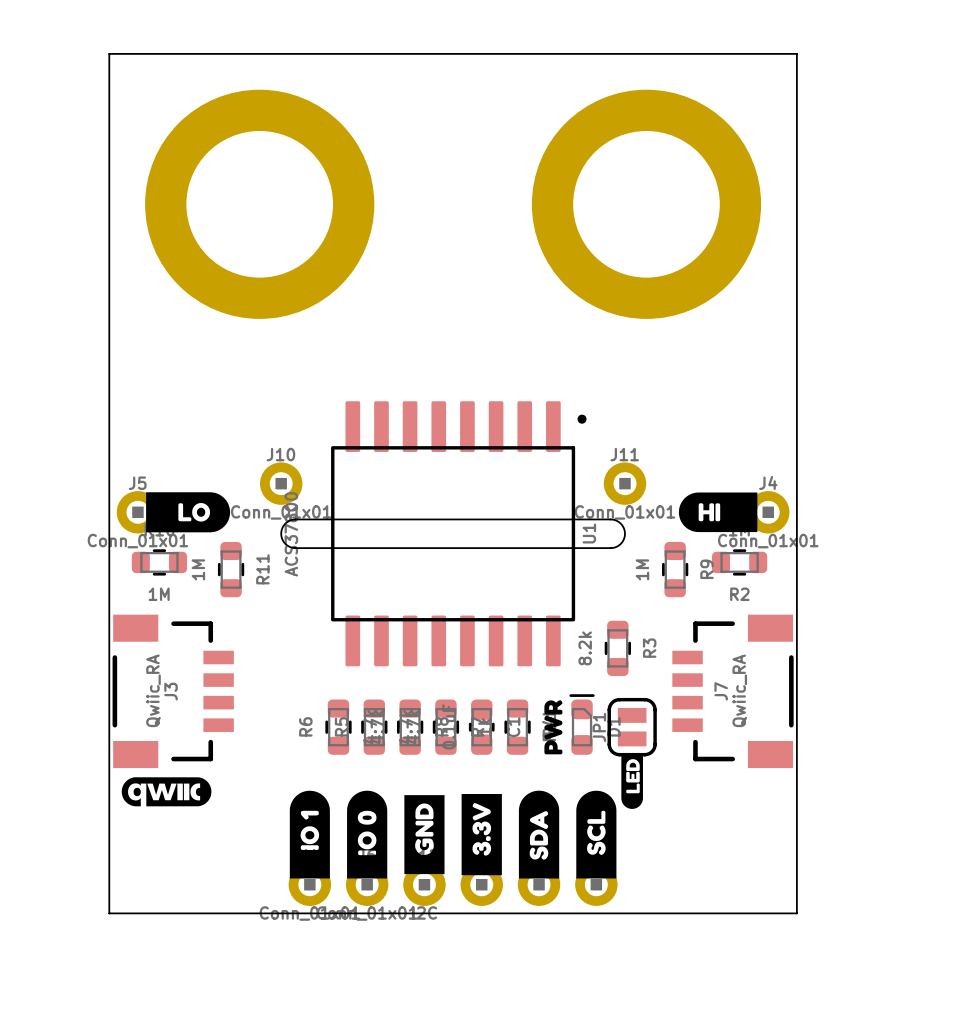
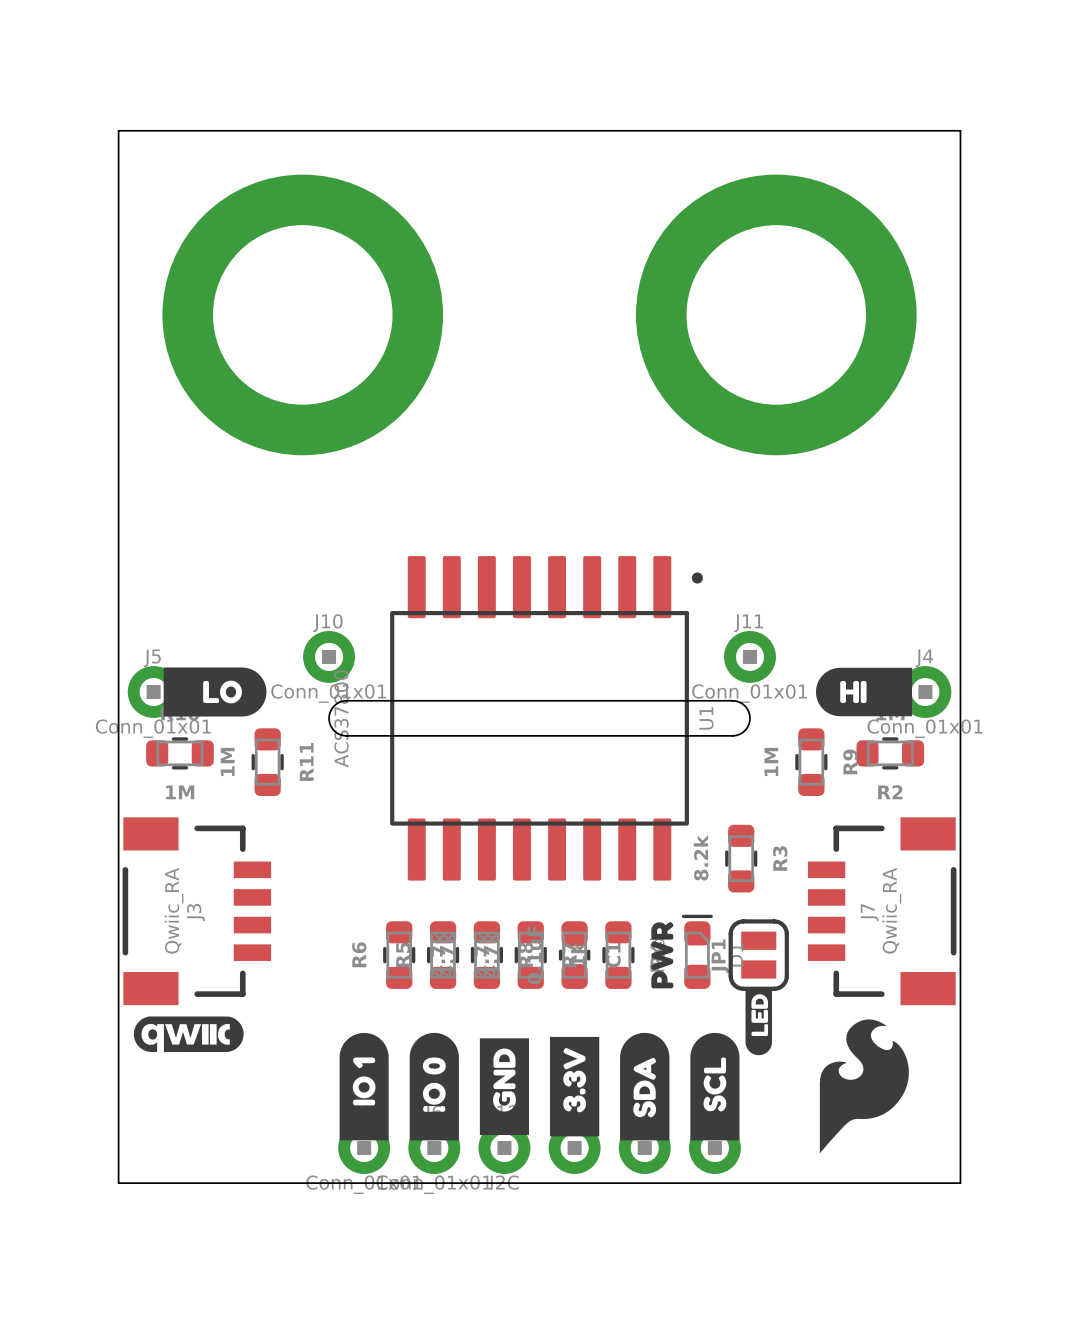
drawing: none -> [819, 1019, 909, 1154]

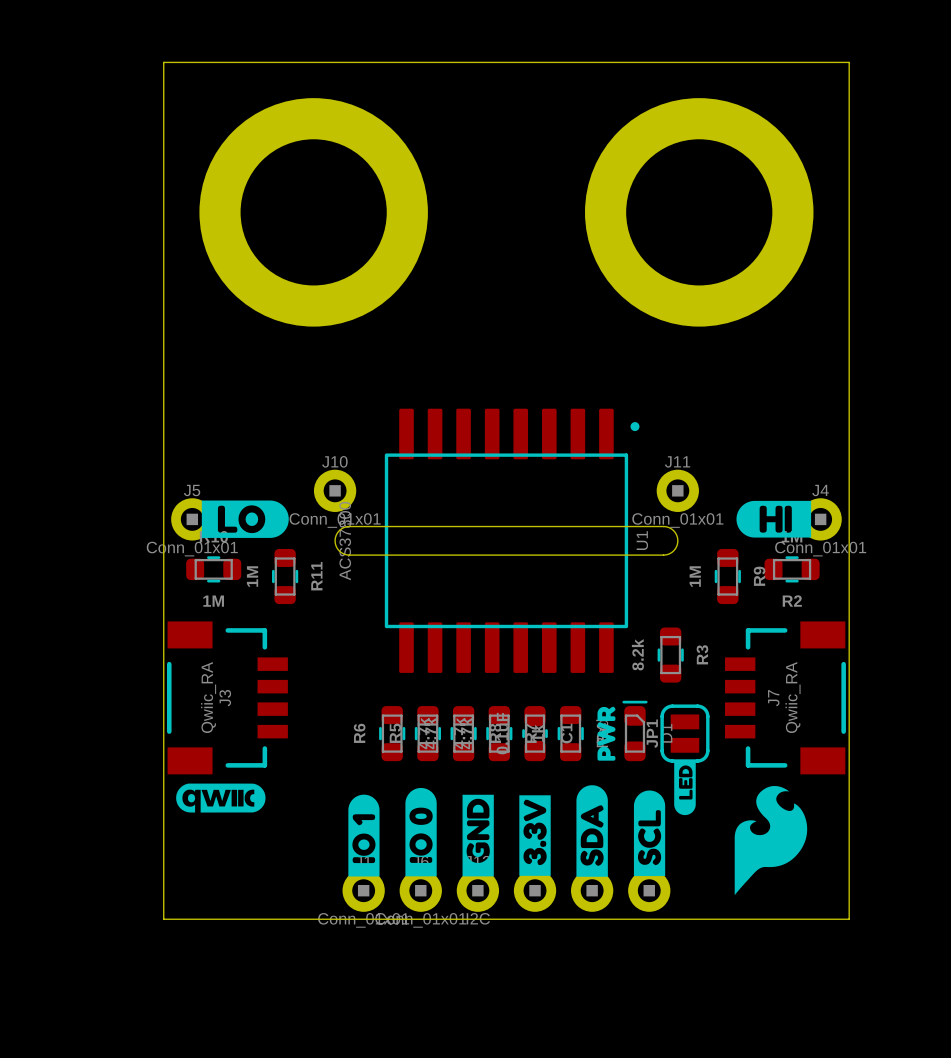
drawing shape: [163, 667, 267, 717] -> [201, 500, 289, 538]
drawing shape: [815, 667, 913, 717] -> [736, 500, 812, 538]
drawing shape: [339, 1032, 389, 1141] -> [348, 794, 380, 877]
drawing shape: [409, 1032, 459, 1141] -> [405, 787, 437, 877]
drawing shape: [620, 1032, 670, 1141] -> [576, 785, 608, 877]
drawing shape: [690, 1032, 740, 1141] -> [633, 790, 666, 877]
drawing shape: [549, 1036, 600, 1137] -> [519, 795, 551, 876]
drawing shape: [479, 1038, 530, 1135] -> [462, 794, 494, 877]

